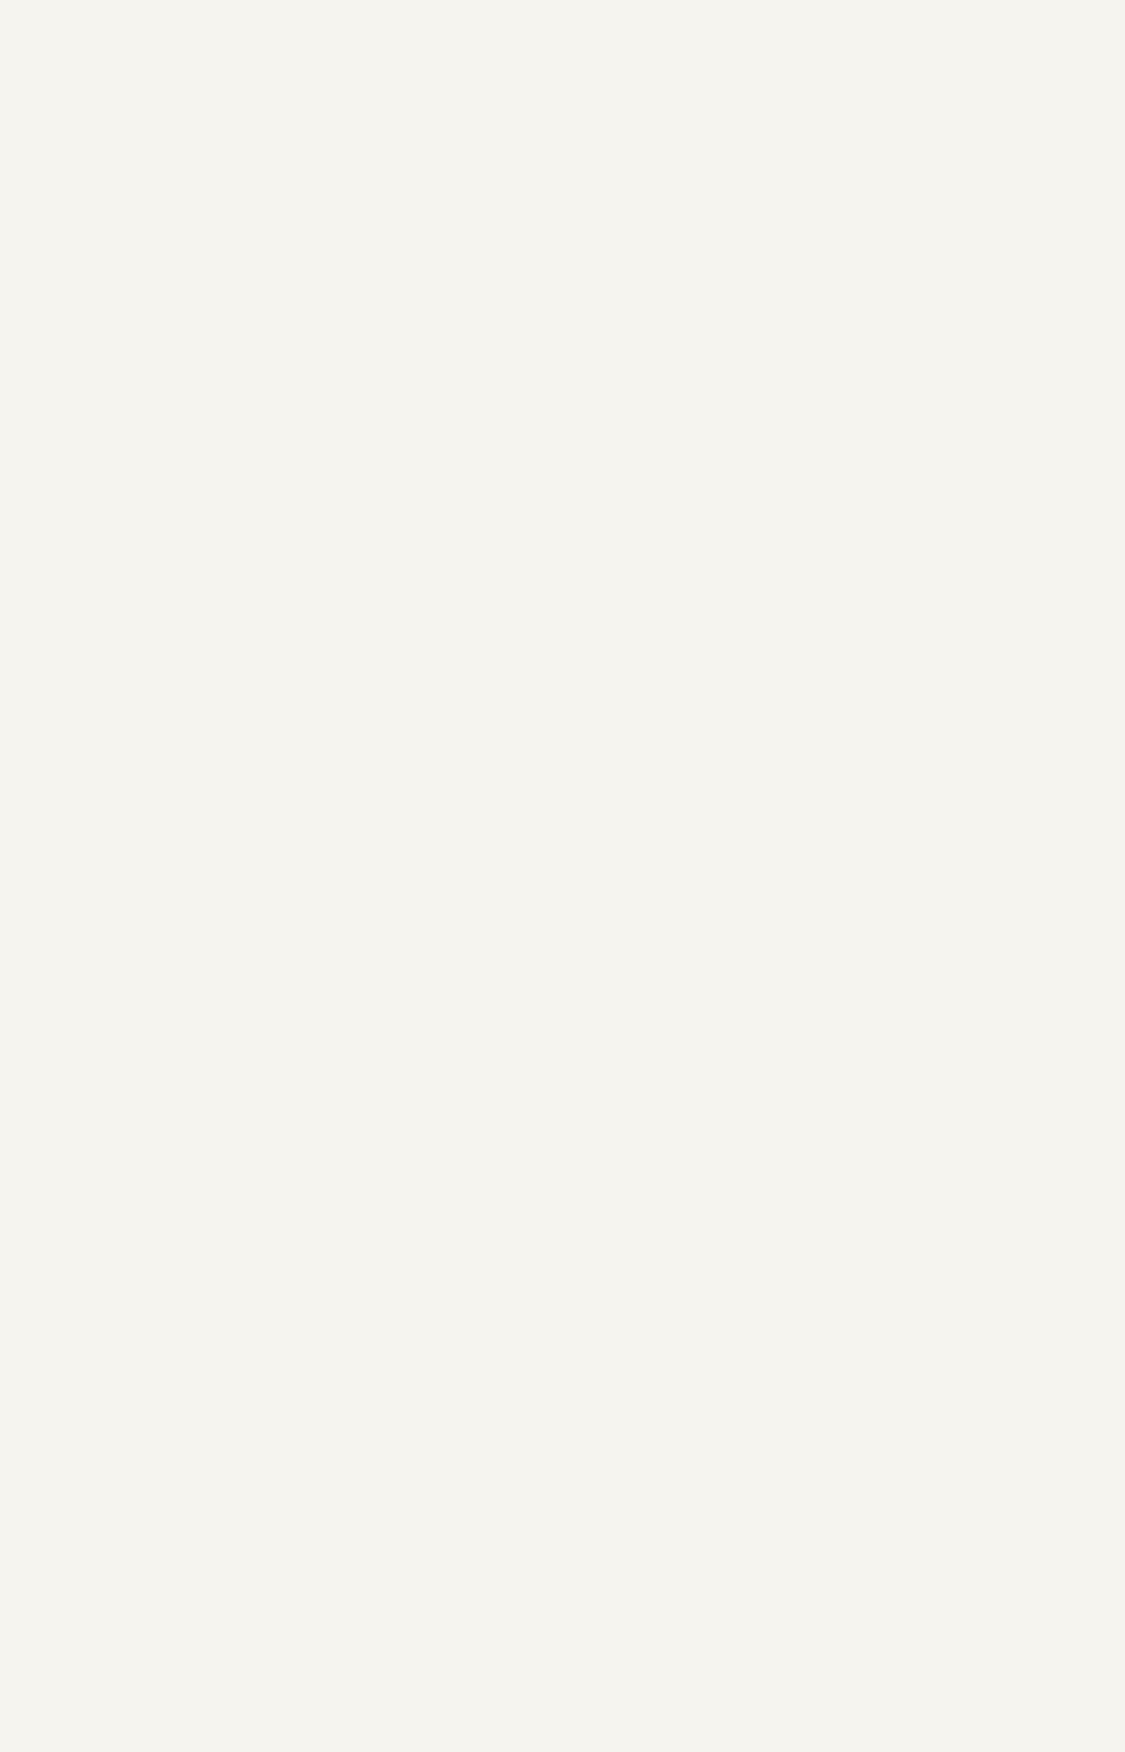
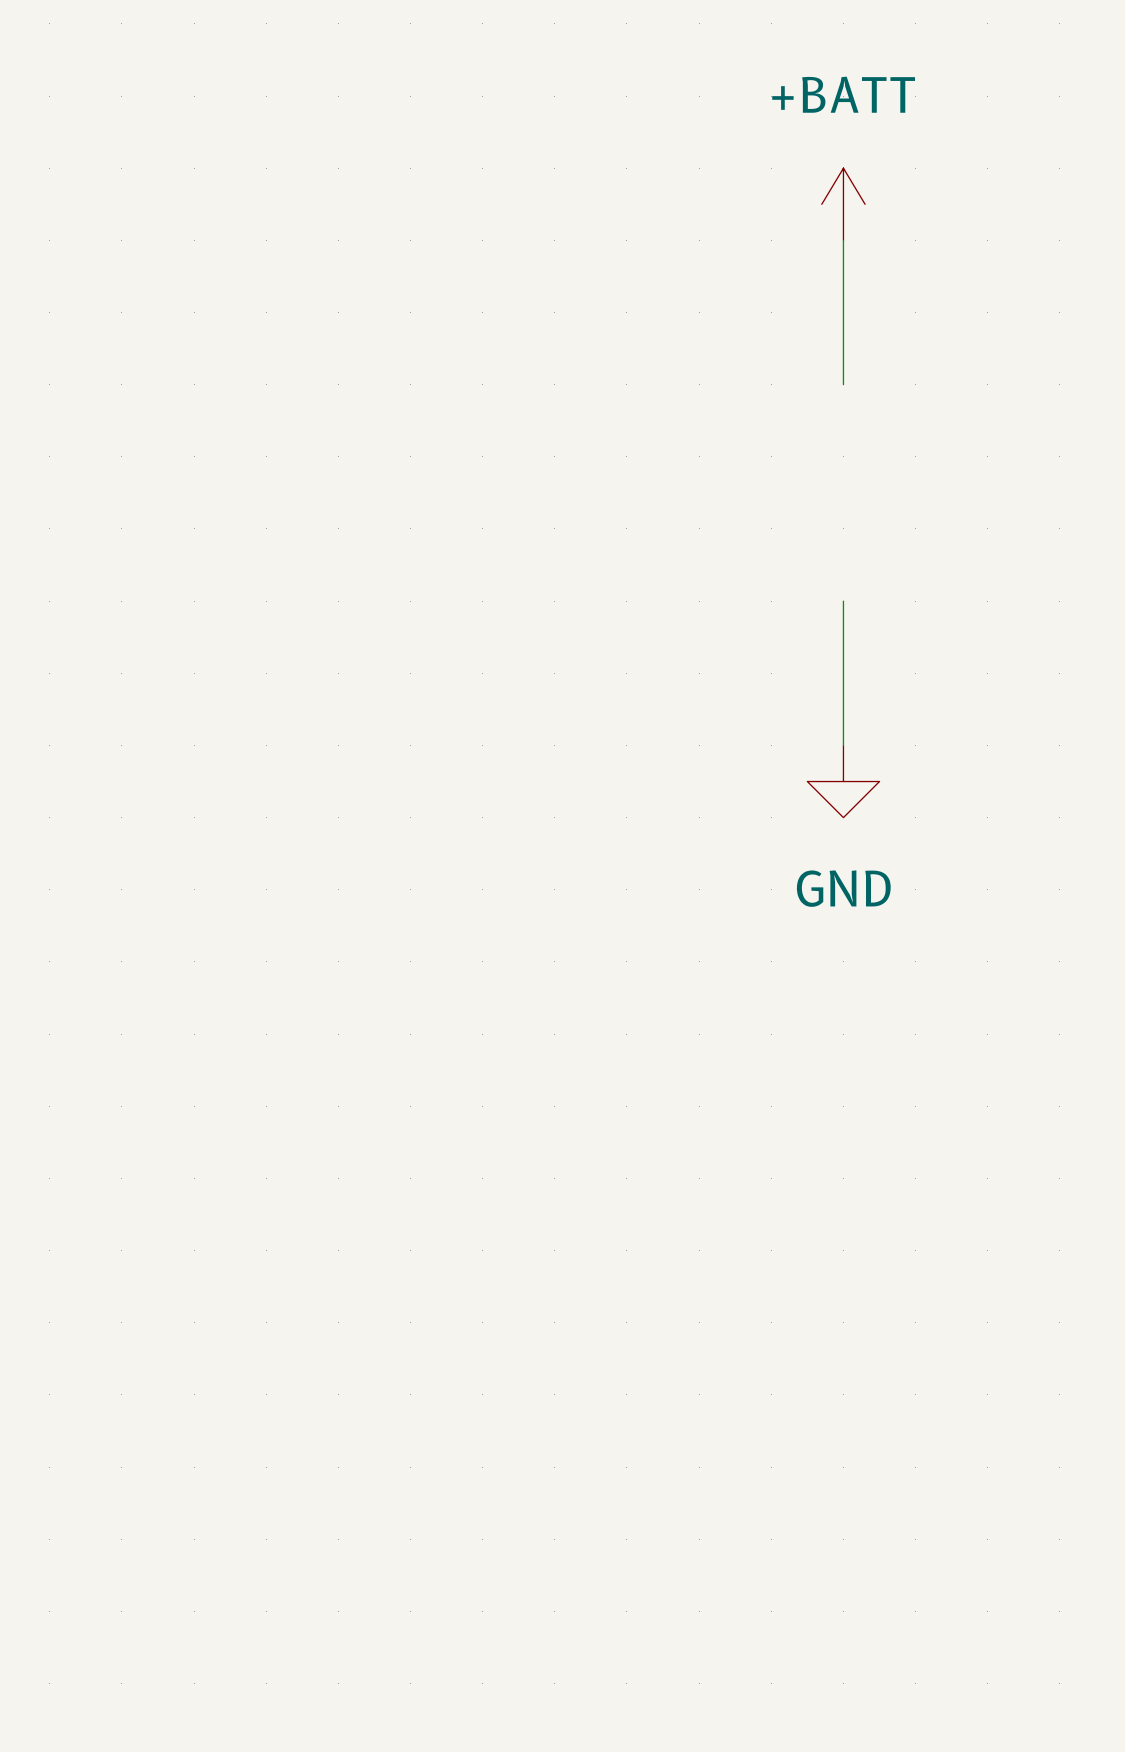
power symbol: none -> +BATT (843, 204)
wire: none -> (843, 240) (843, 384)
wire: none -> (843, 601) (843, 745)
power symbol: none -> GND (843, 781)

